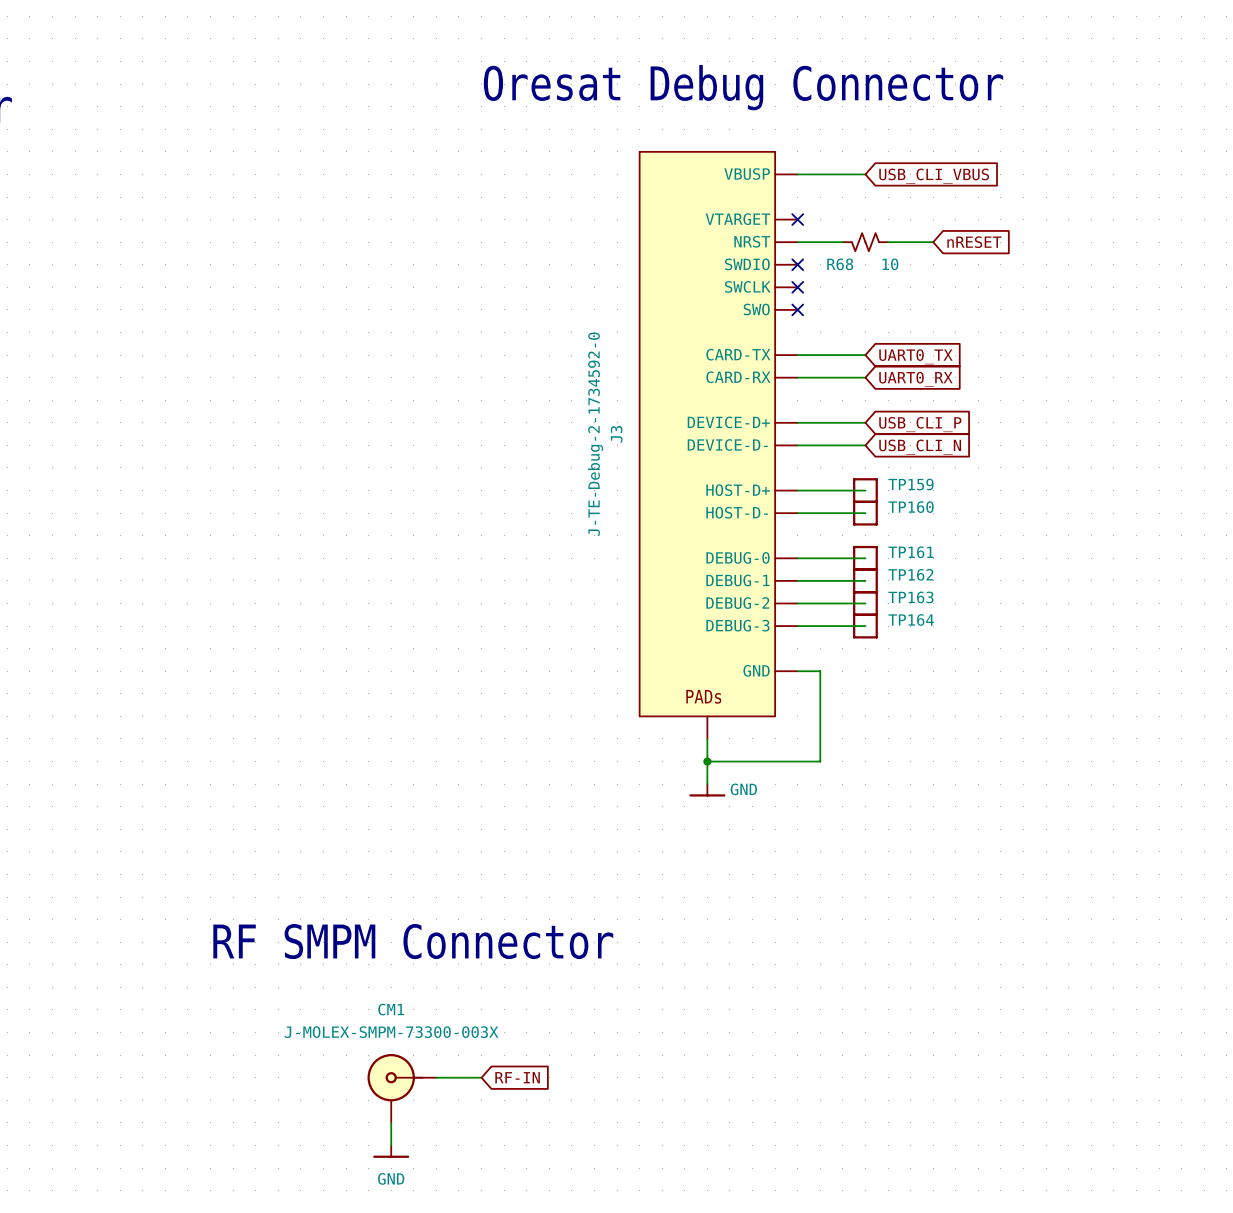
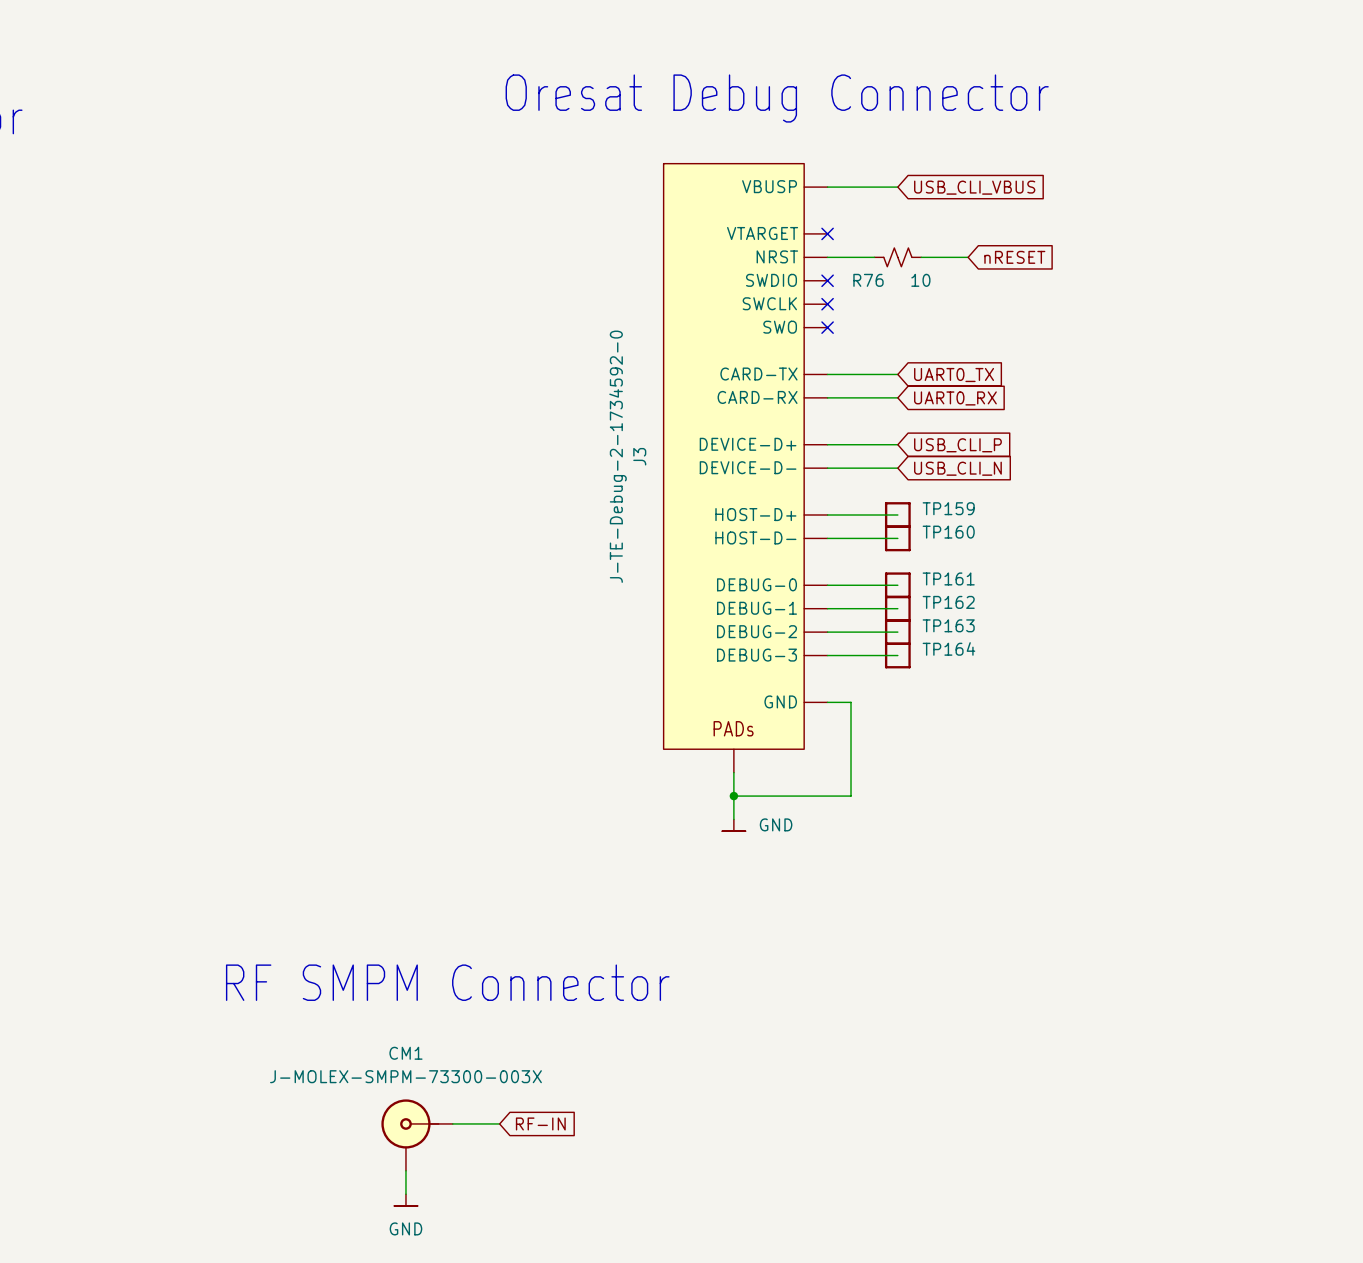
R68 name: R68 (840, 264) -> R76 (868, 280)
power symbol shape: [689, 784, 726, 797] -> [722, 819, 746, 832]
power symbol shape: [373, 1145, 410, 1158] -> [394, 1194, 418, 1206]

